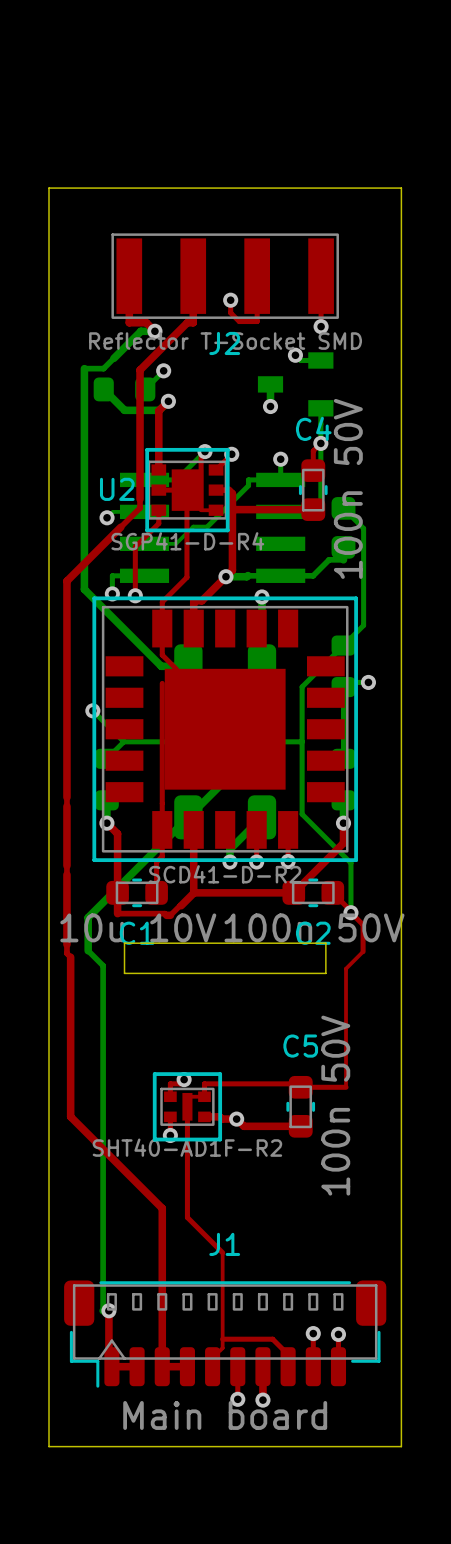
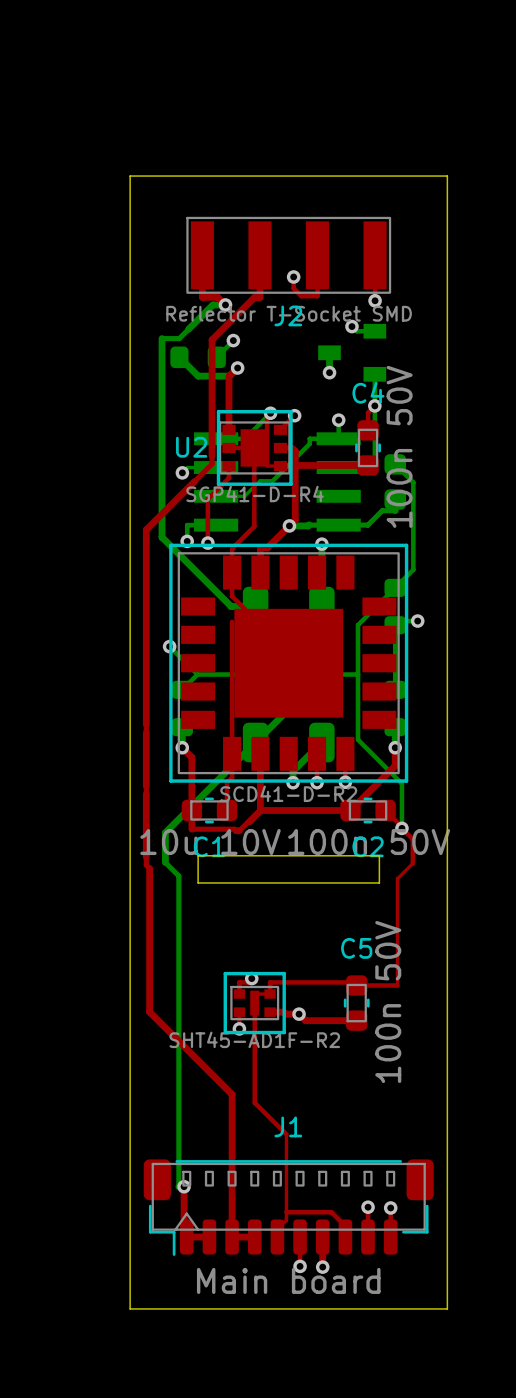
part value: SHT40-AD1F-R2 (187, 1147) -> SHT45-AD1F-R2 (254, 1039)

